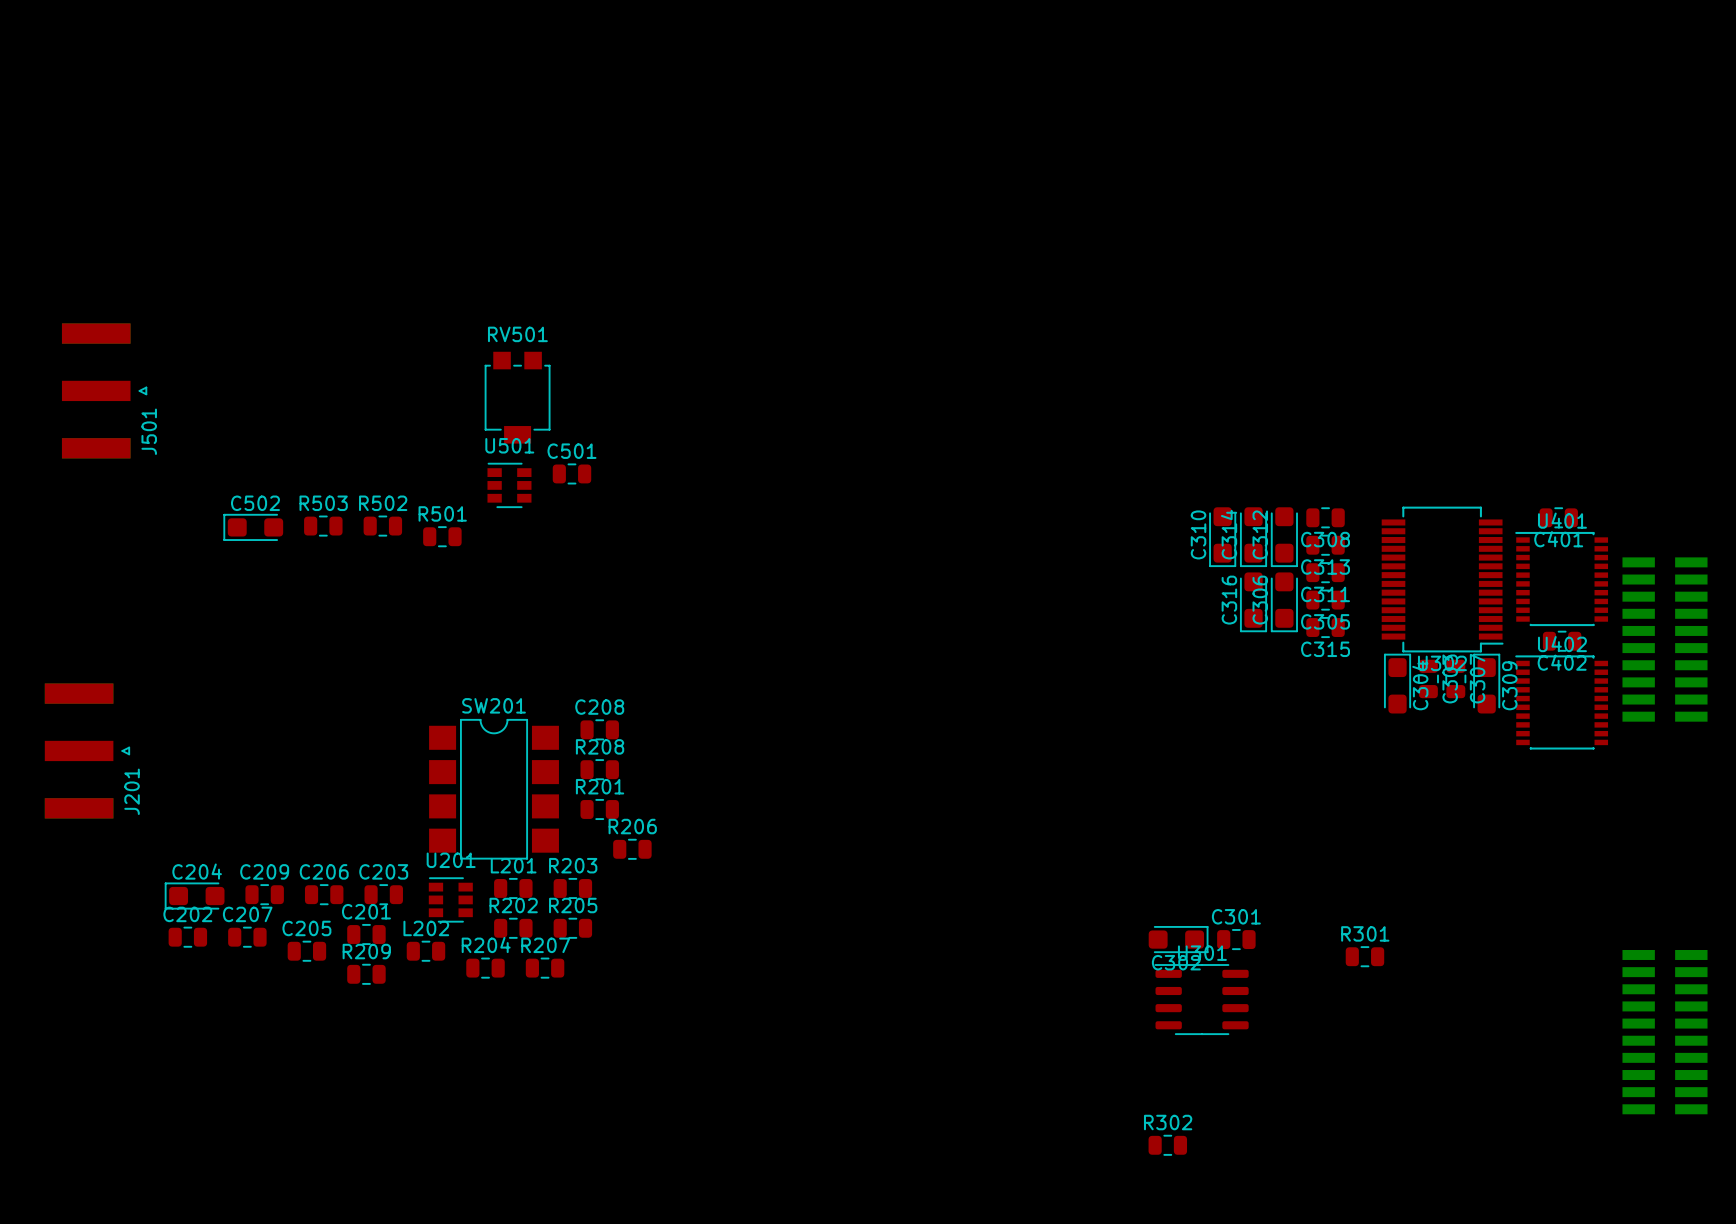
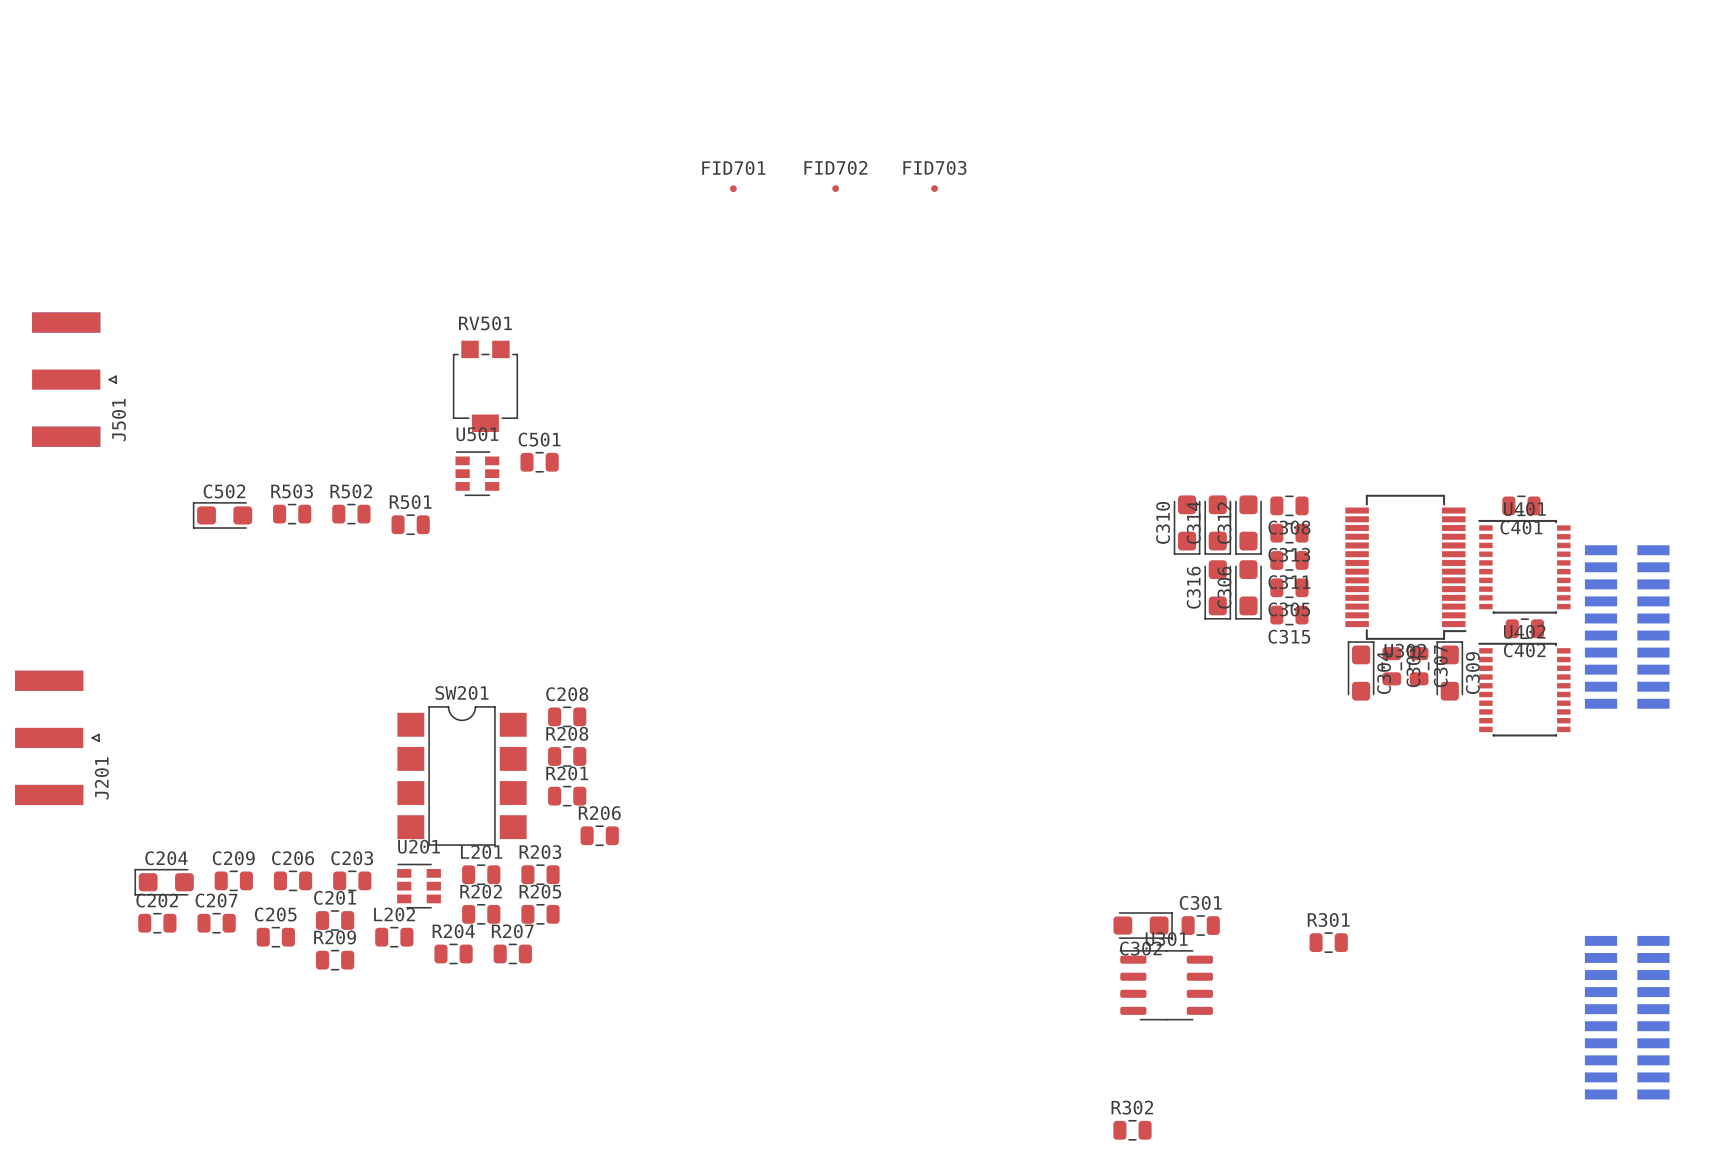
FID702: none -> (835, 188)
FID703: none -> (934, 188)
FID701: none -> (733, 188)

